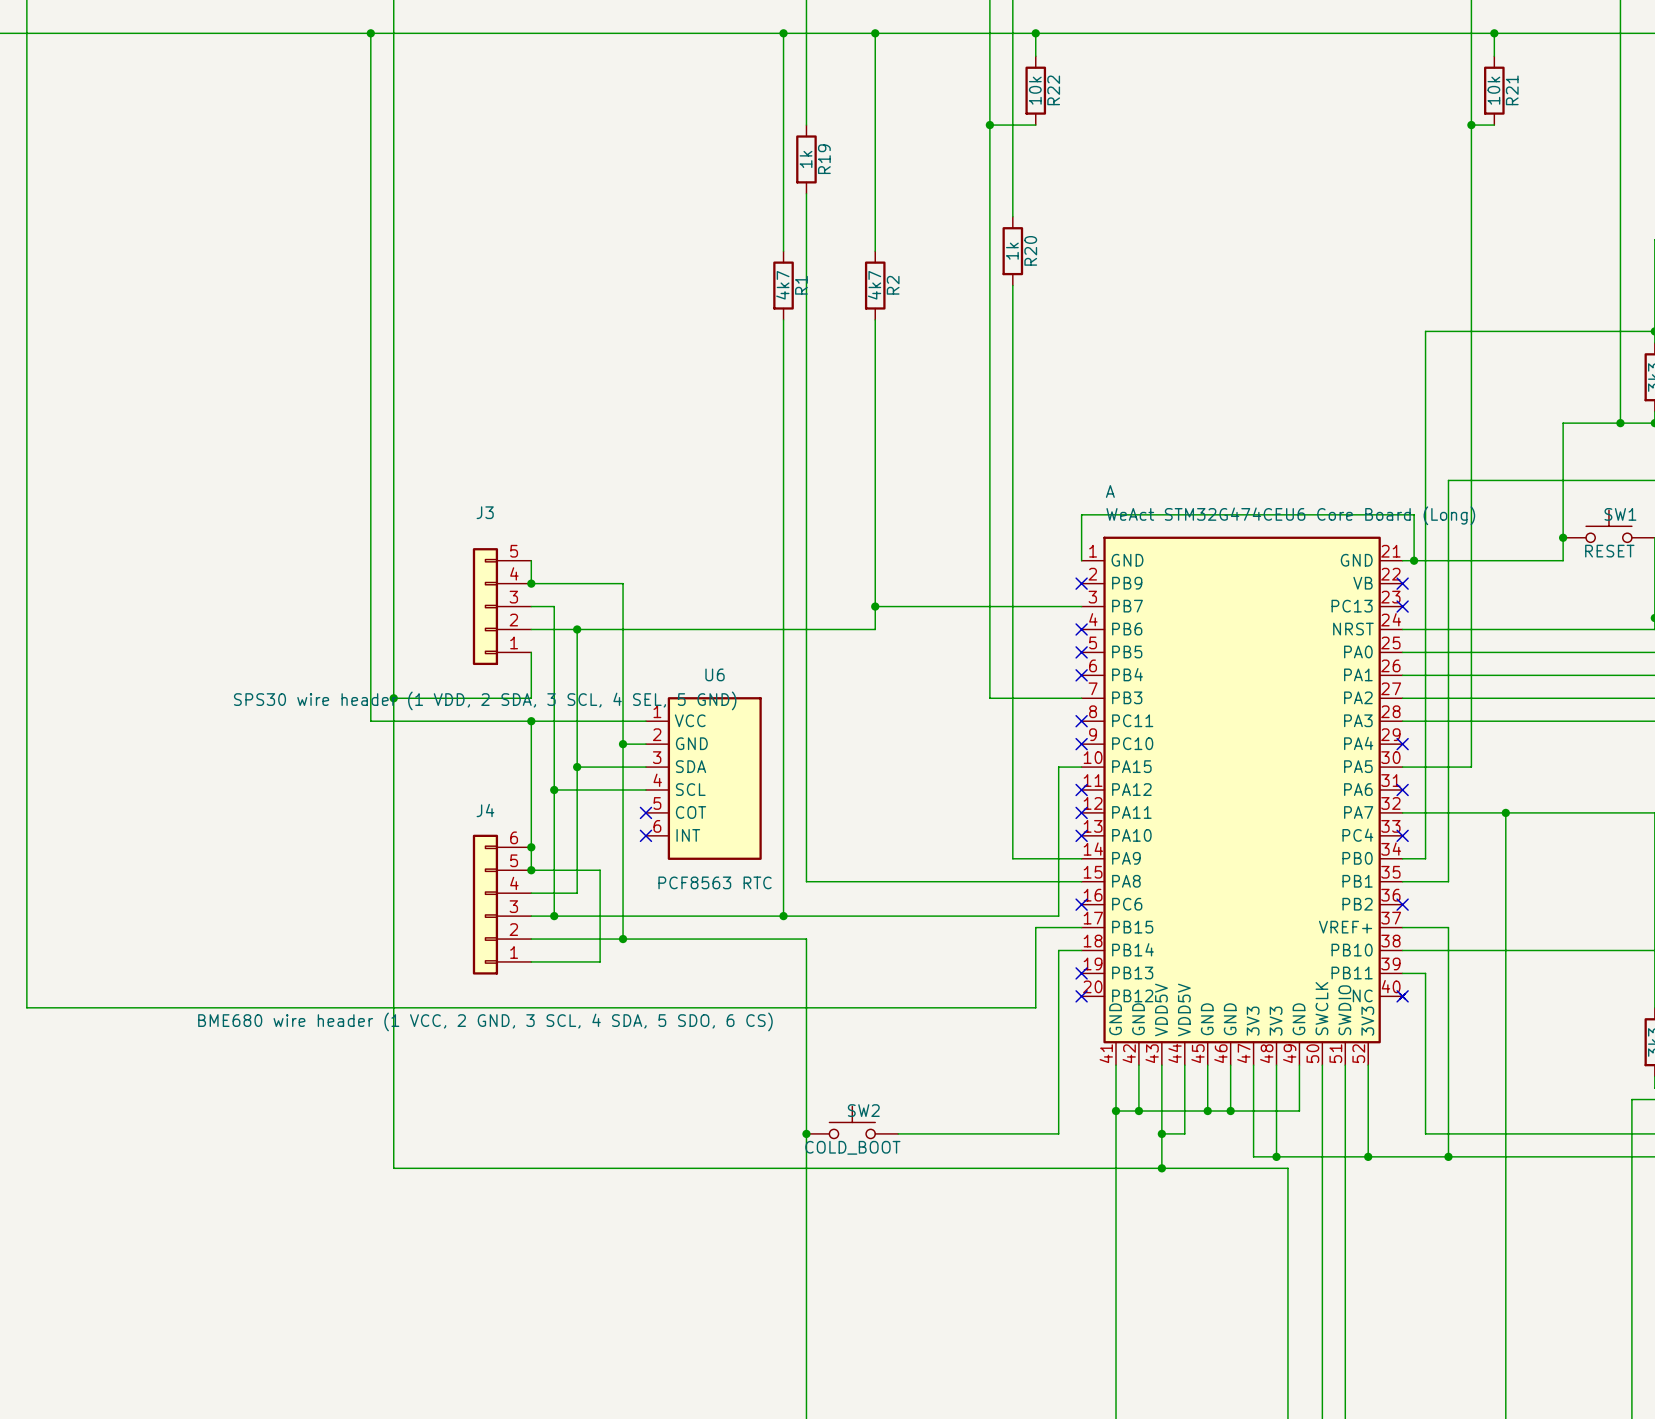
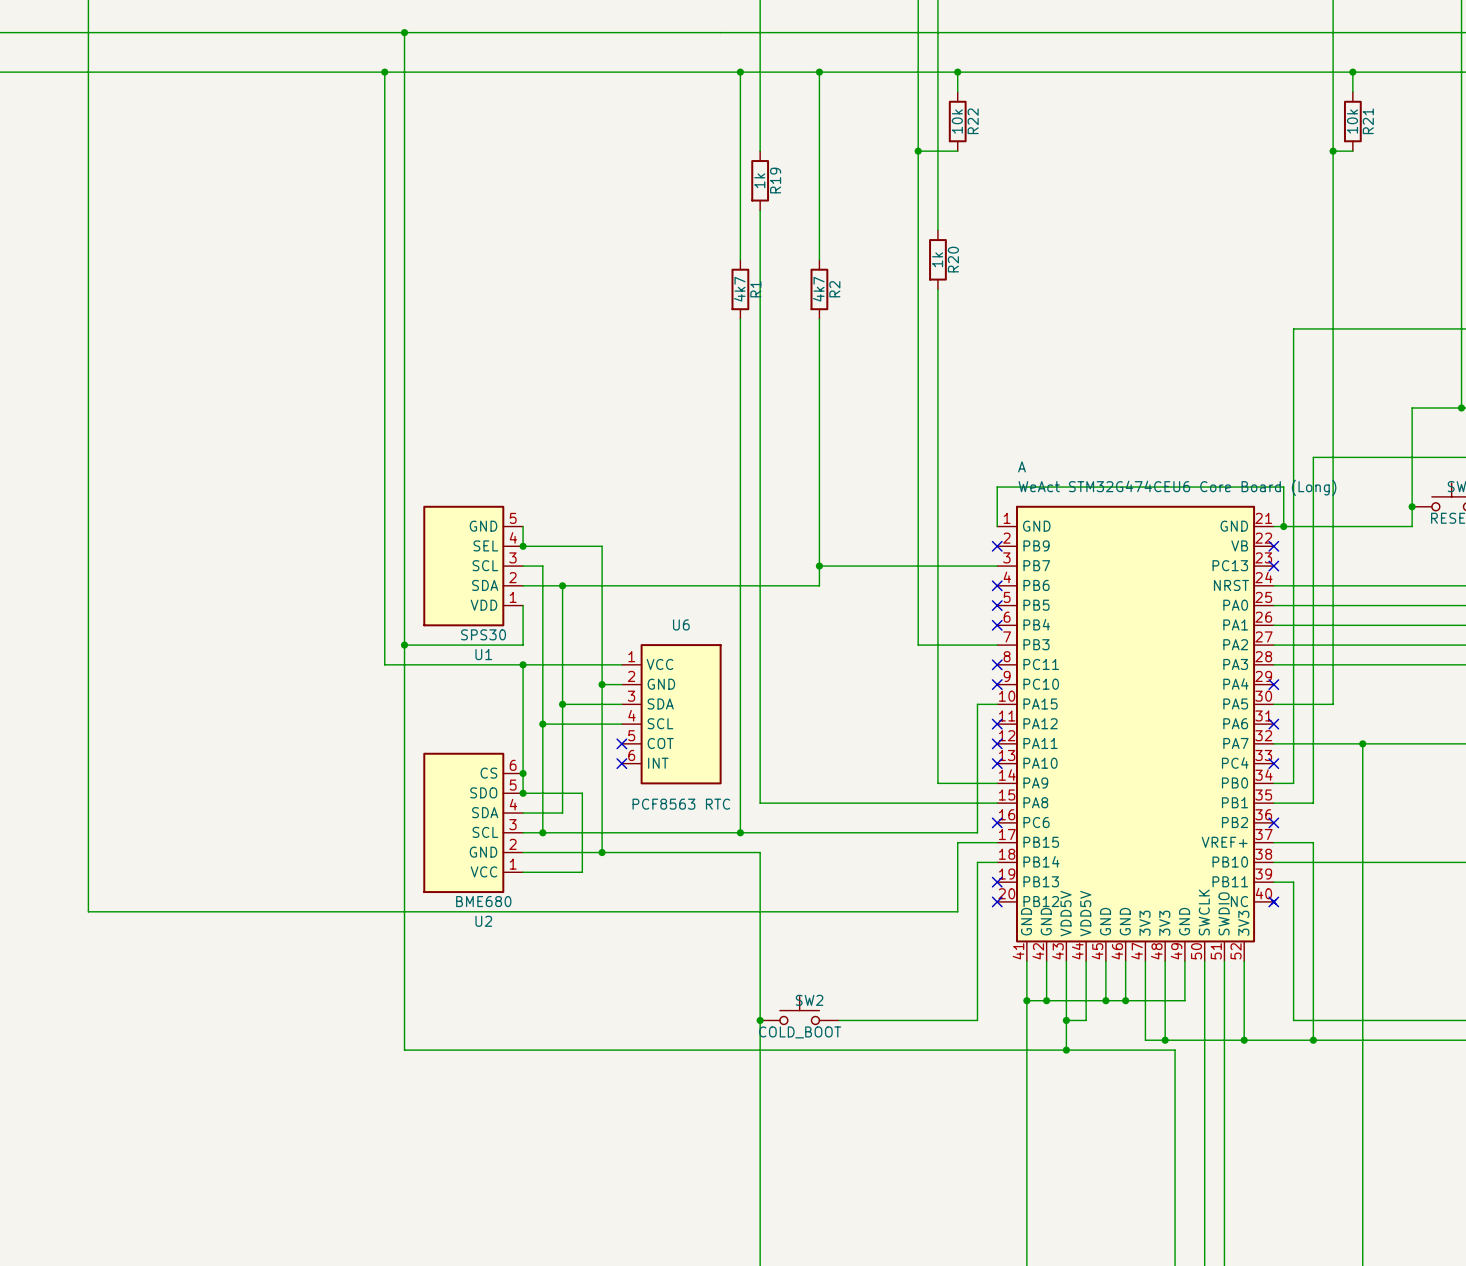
U1: none -> SPS30 (473, 566)
J3: SPS30 wire header (1 VDD, 2 SDA, 3 SCL, 4 SEL, 5 GND) (502, 606) -> none
U2: none -> BME680 (473, 822)
J4: BME680 wire header (1 VCC, 2 GND, 3 SCL, 4 SDA, 5 SDO, 6 CS) (502, 904) -> none

